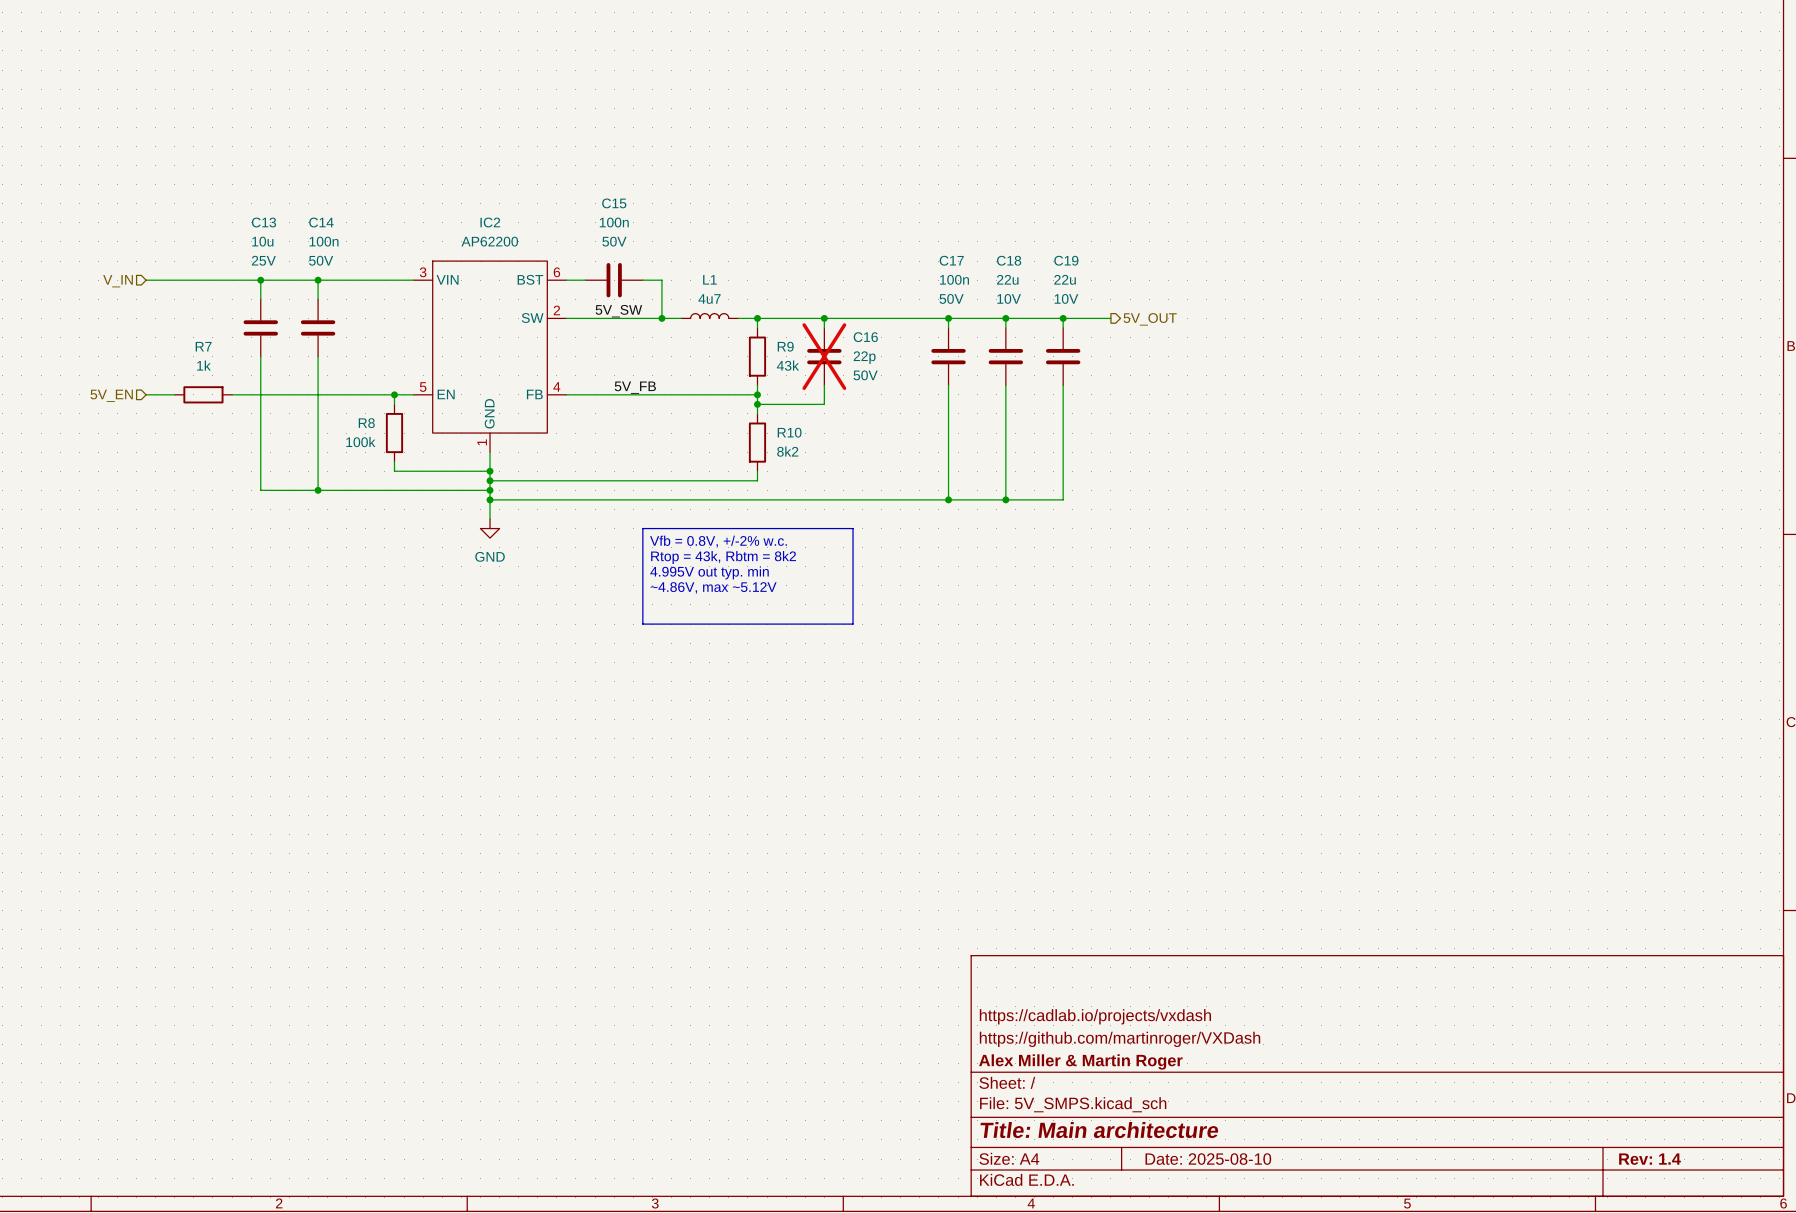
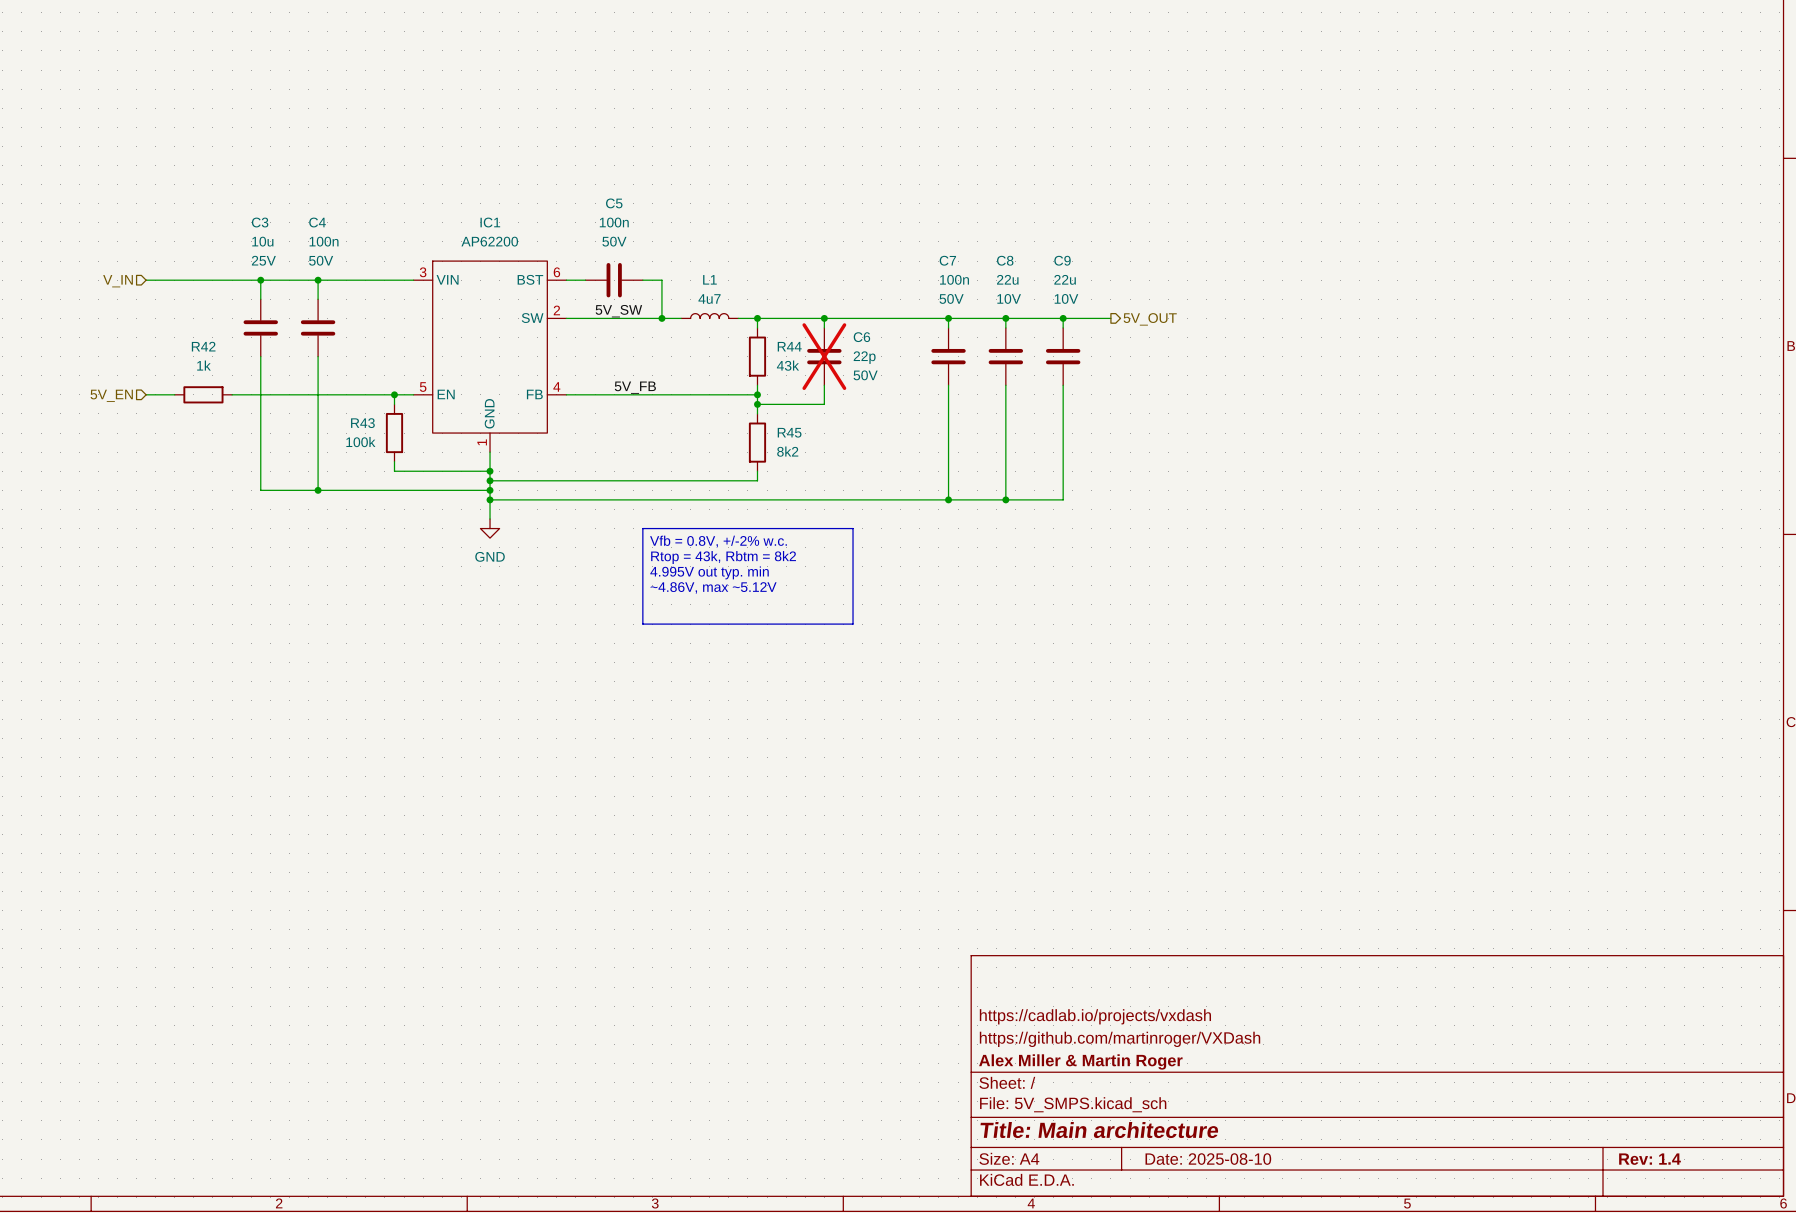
C15 name: C15 (614, 203) -> C5 (614, 203)
C13 name: C13 (263, 222) -> C3 (260, 222)
C14 name: C14 (321, 222) -> C4 (317, 222)
IC2 name: IC2 (490, 222) -> IC1 (490, 222)
C17 name: C17 (951, 260) -> C7 (947, 260)
C18 name: C18 (1009, 260) -> C8 (1005, 260)
C19 name: C19 (1066, 260) -> C9 (1062, 260)
C16 name: C16 (865, 337) -> C6 (861, 337)
R7 name: R7 (203, 346) -> R42 (203, 346)
R9 name: R9 (785, 346) -> R44 (789, 346)
R8 name: R8 (366, 423) -> R43 (362, 423)
R10 name: R10 (789, 432) -> R45 (789, 432)

